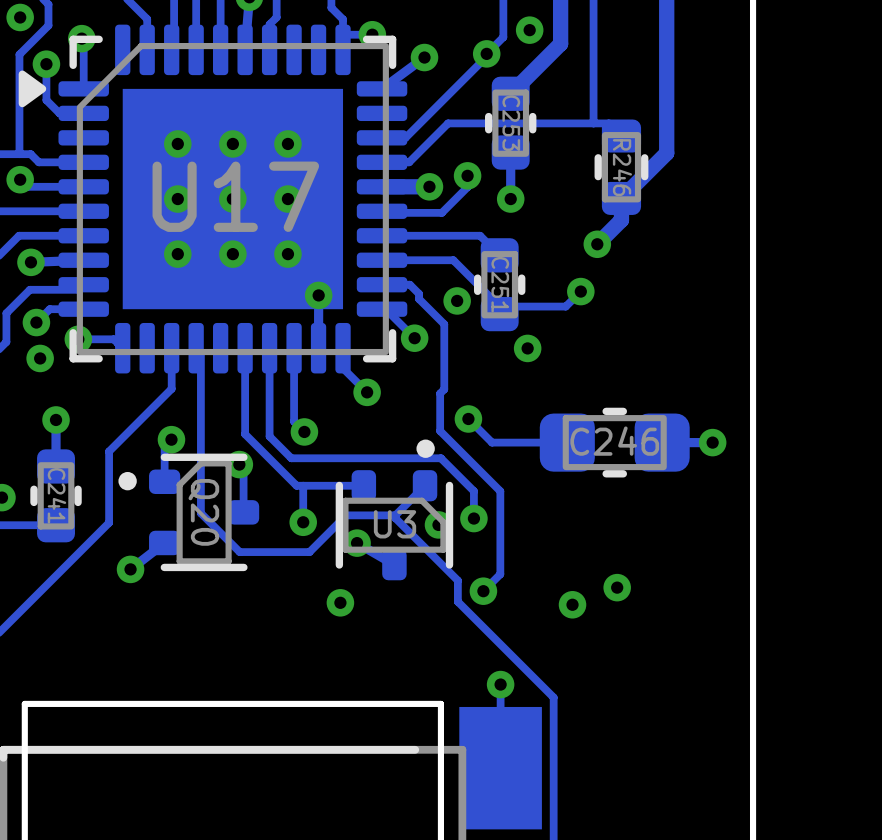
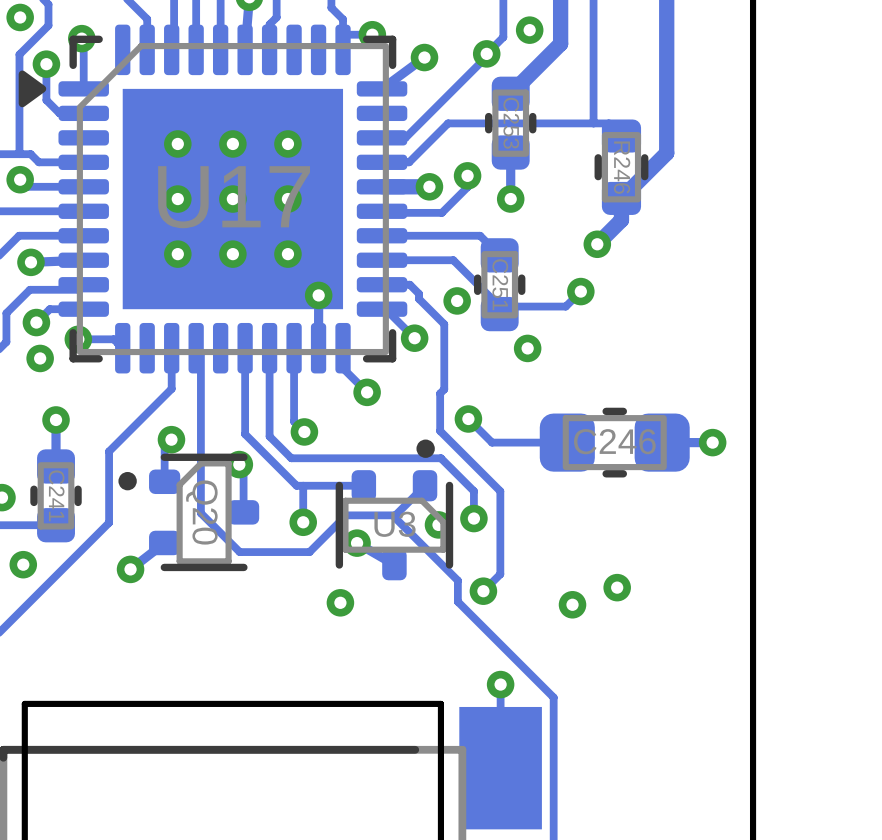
via: none -> (23, 564)

